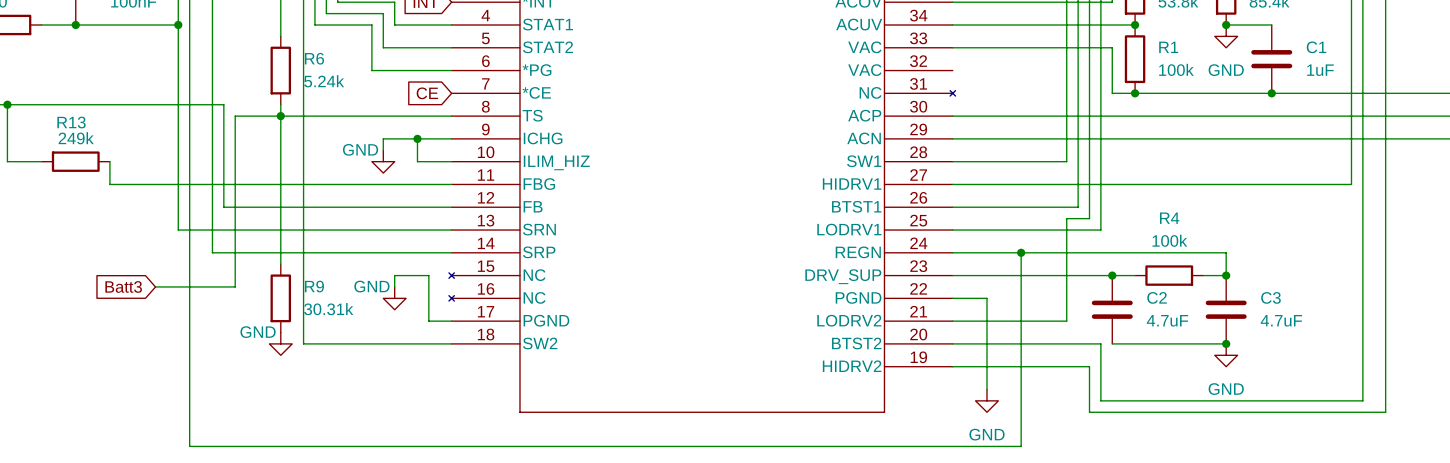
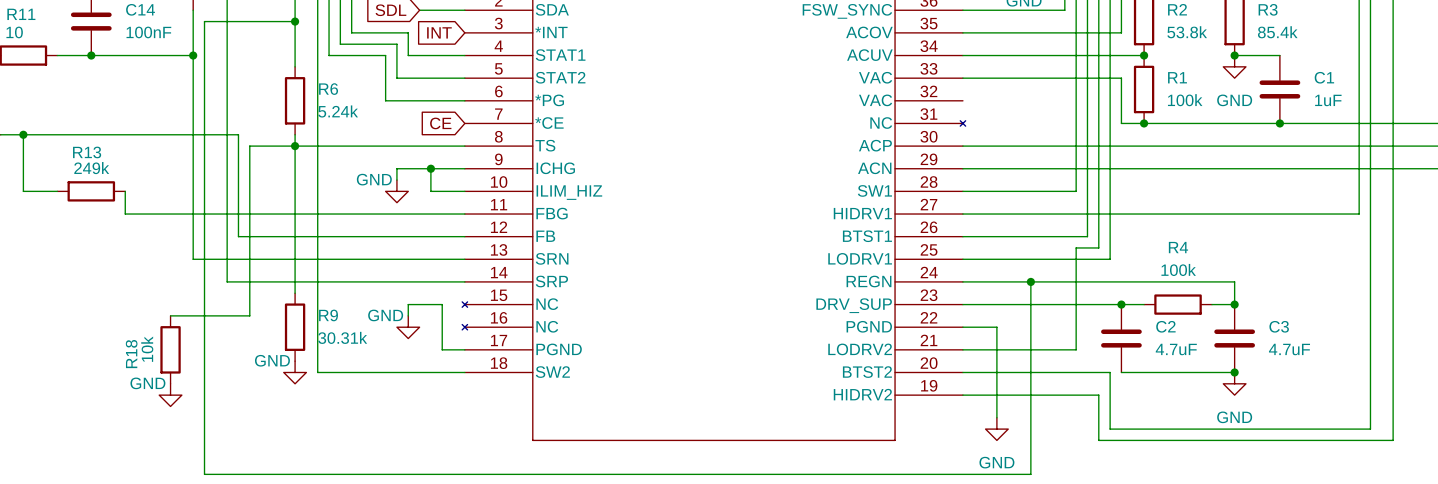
global label: Batt3 (123, 286) -> none
R18: none -> 10k (170, 349)
power symbol: none -> GND (170, 395)

